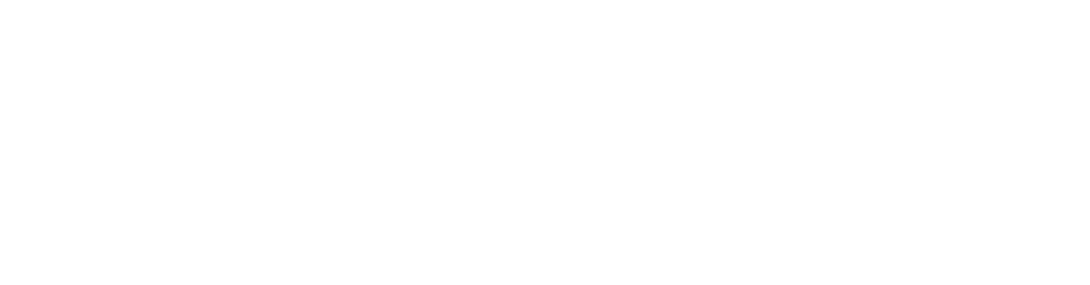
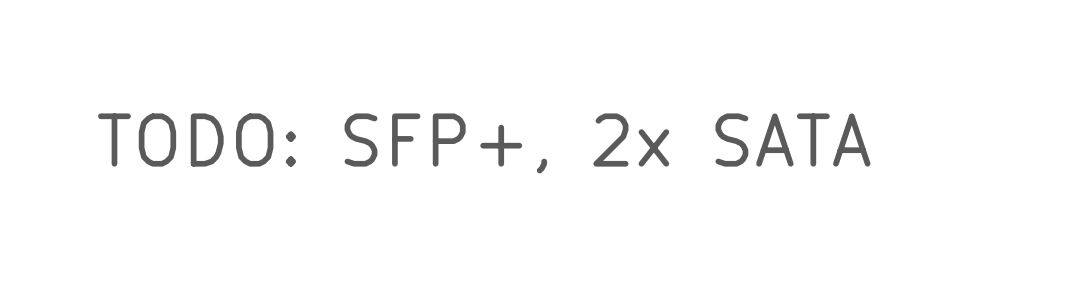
text: none -> TODO: SFP+, 2x SATA (484, 143)

